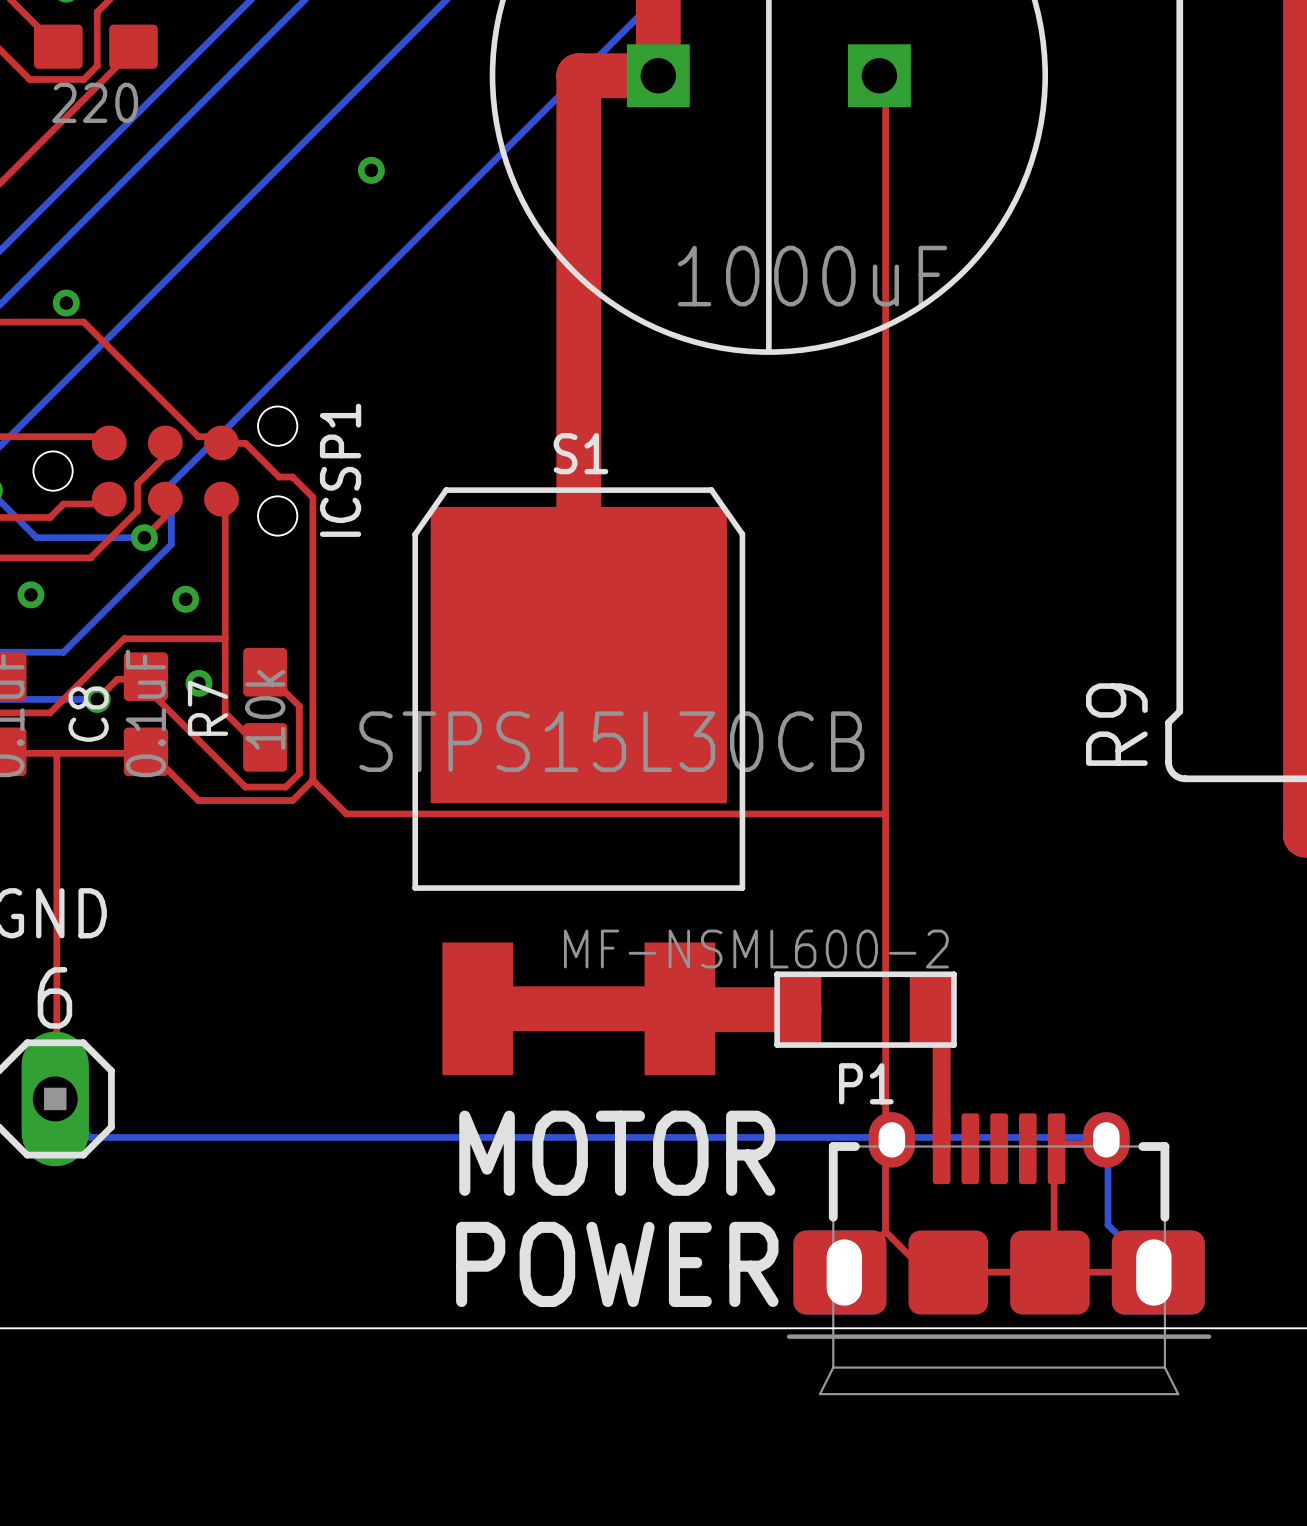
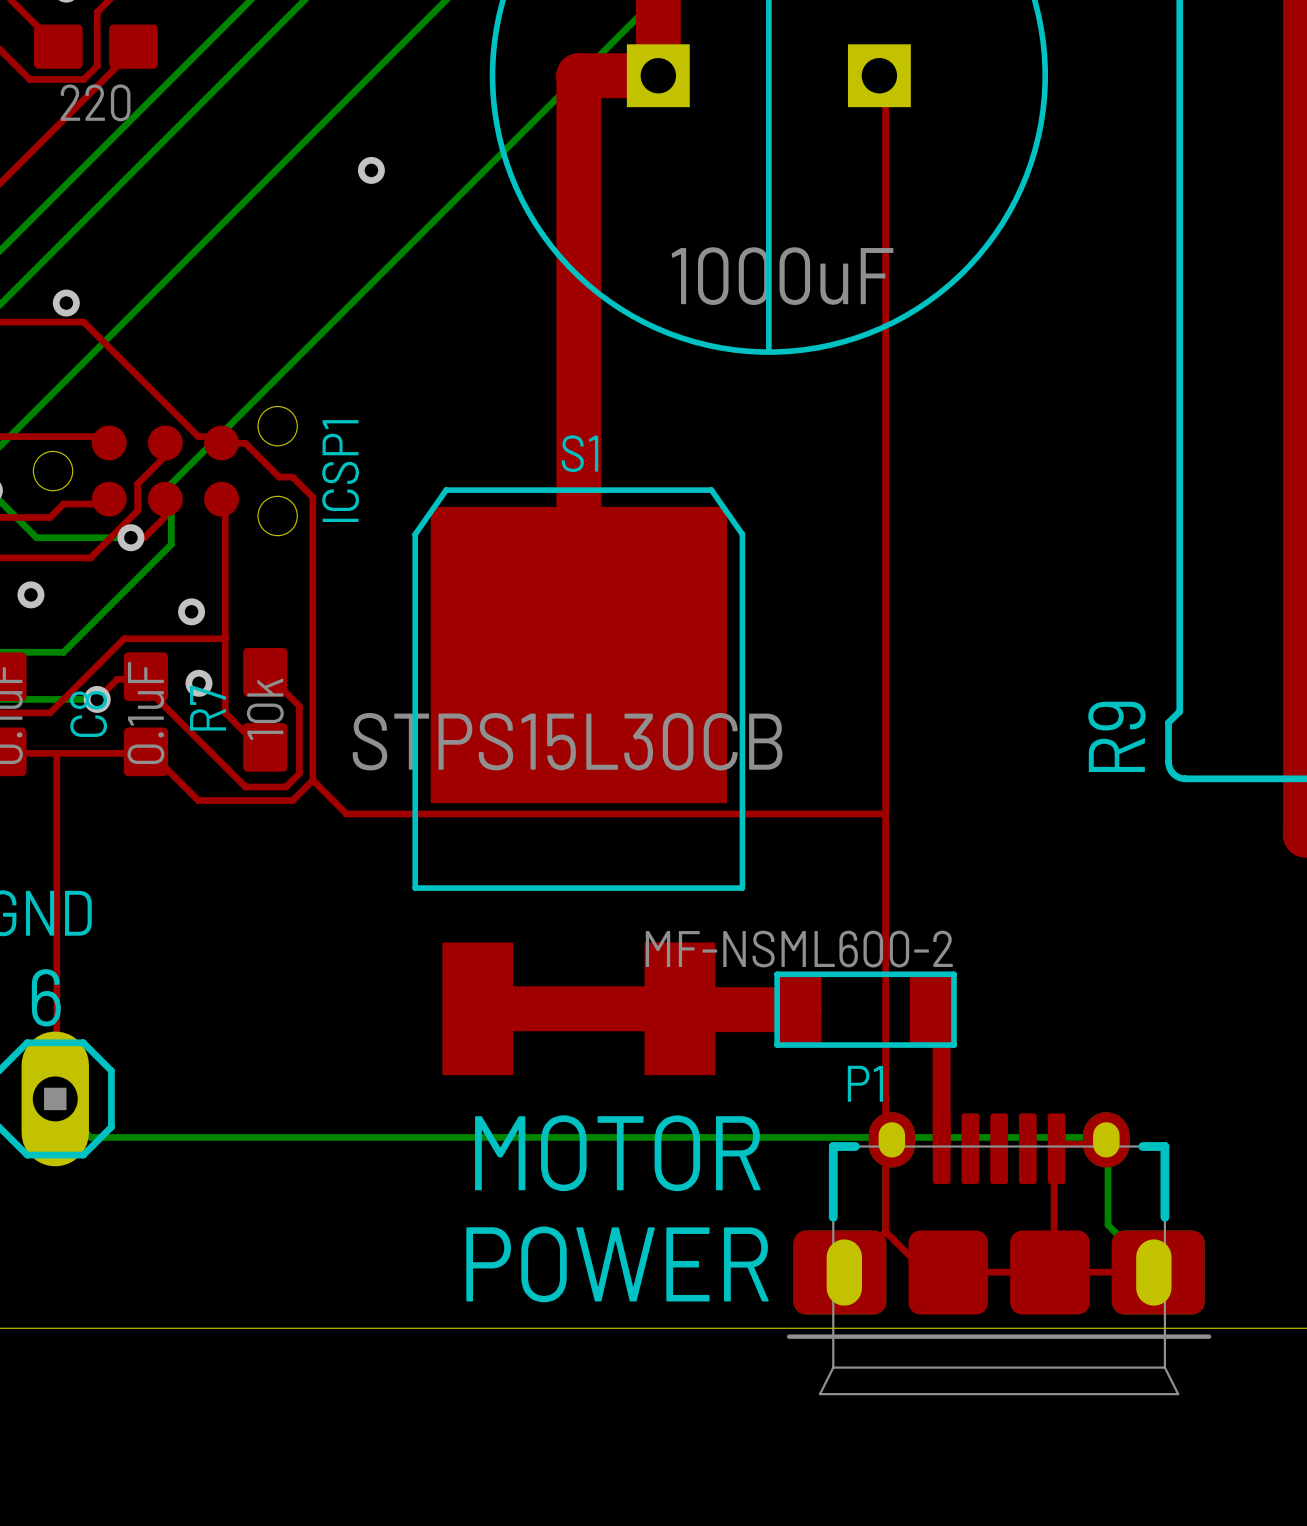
via position: (144, 537) -> (130, 537)
via position: (185, 599) -> (191, 611)

